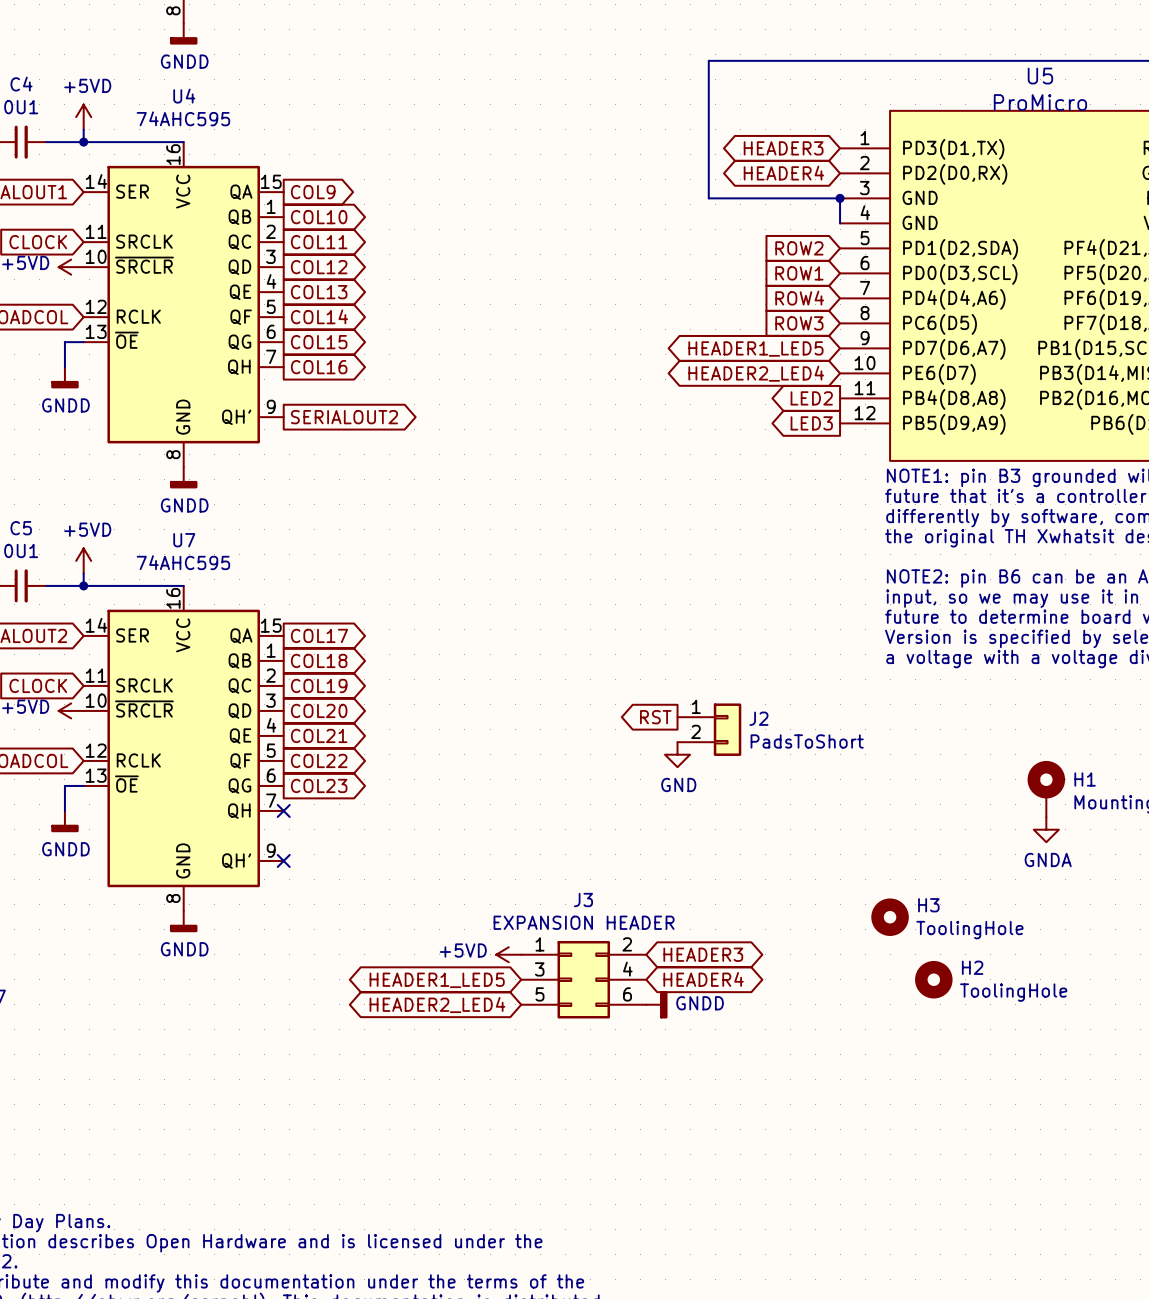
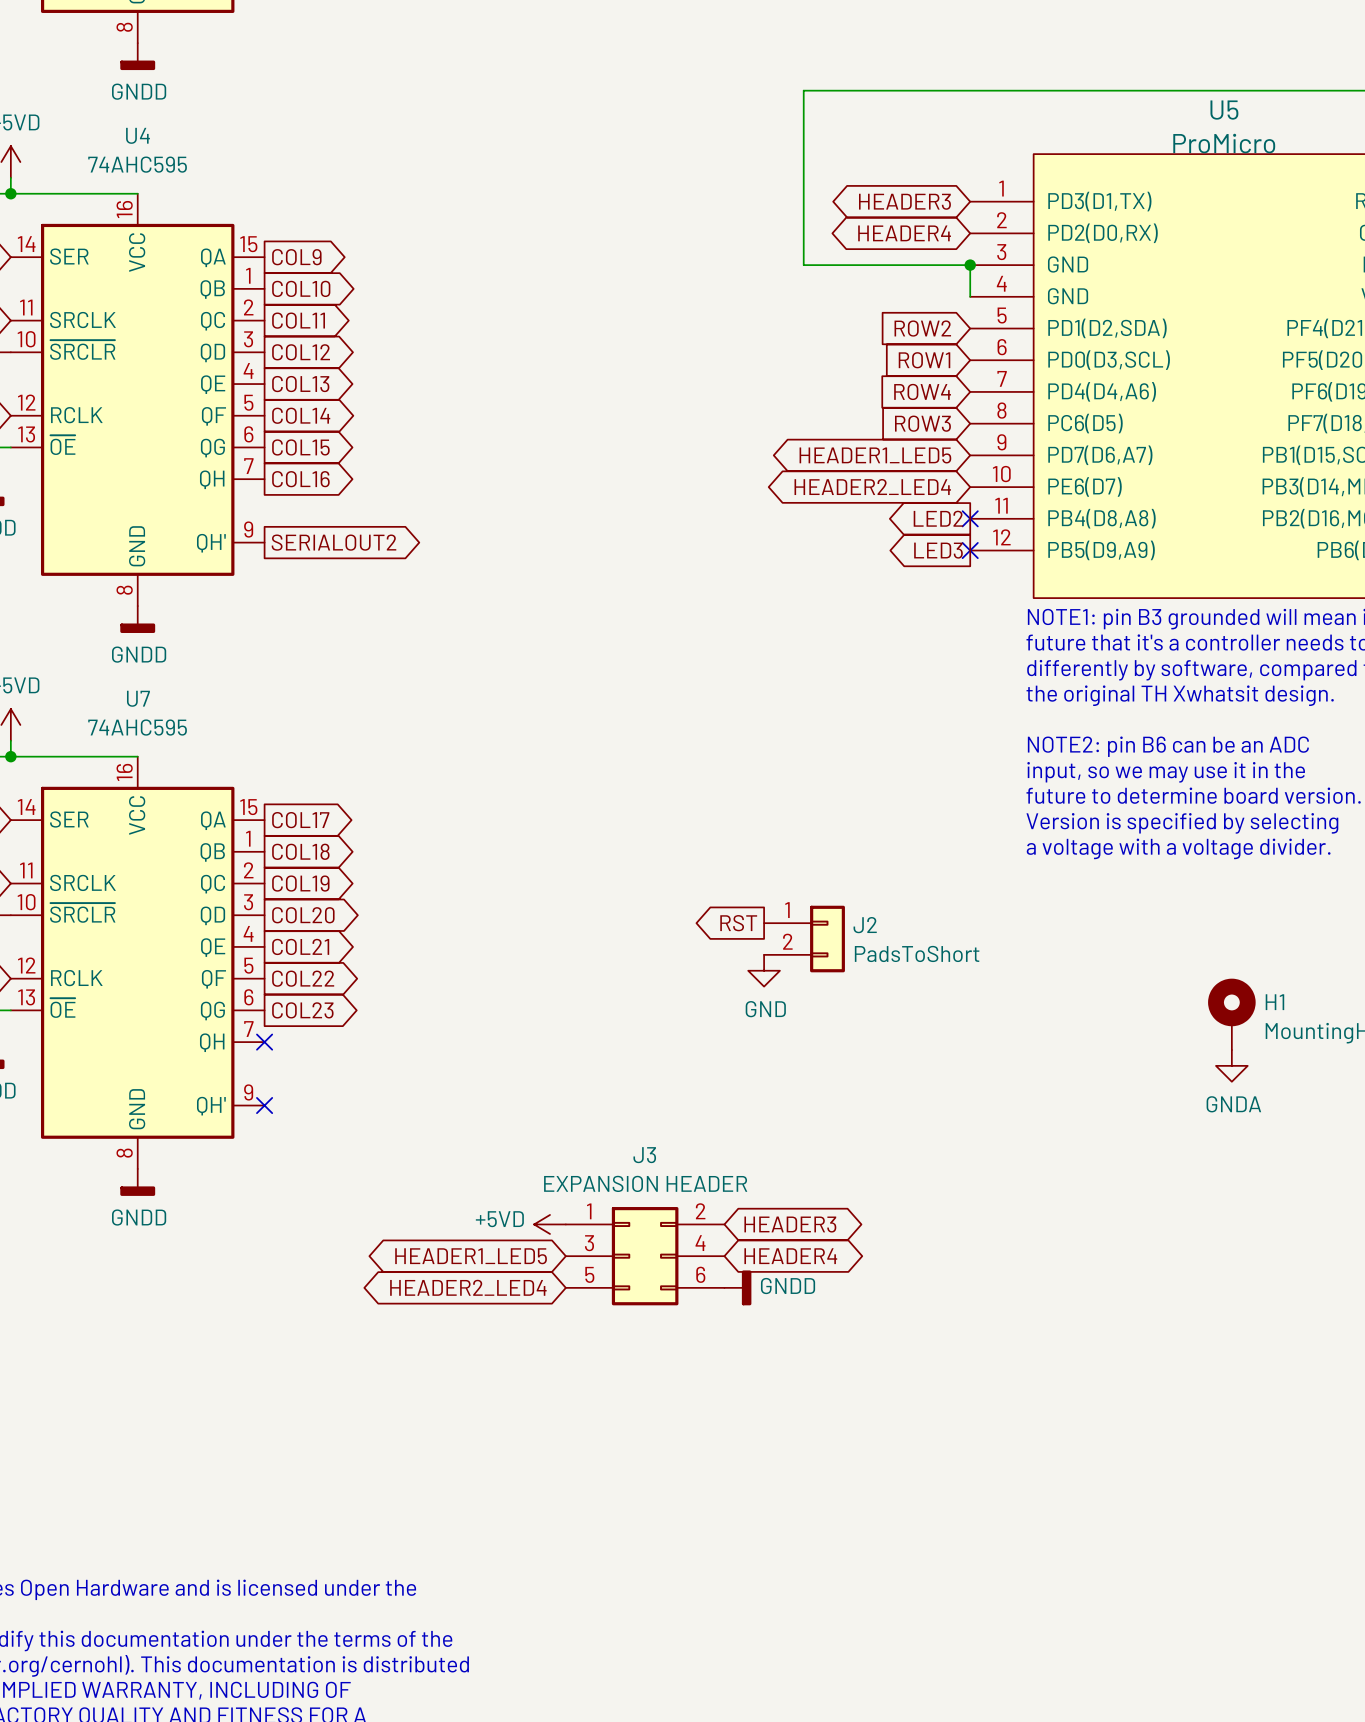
no-connect mark: none -> (970, 518)
no-connect mark: none -> (970, 550)
H3: ToolingHole (890, 917) -> none
H2: ToolingHole (933, 979) -> none

